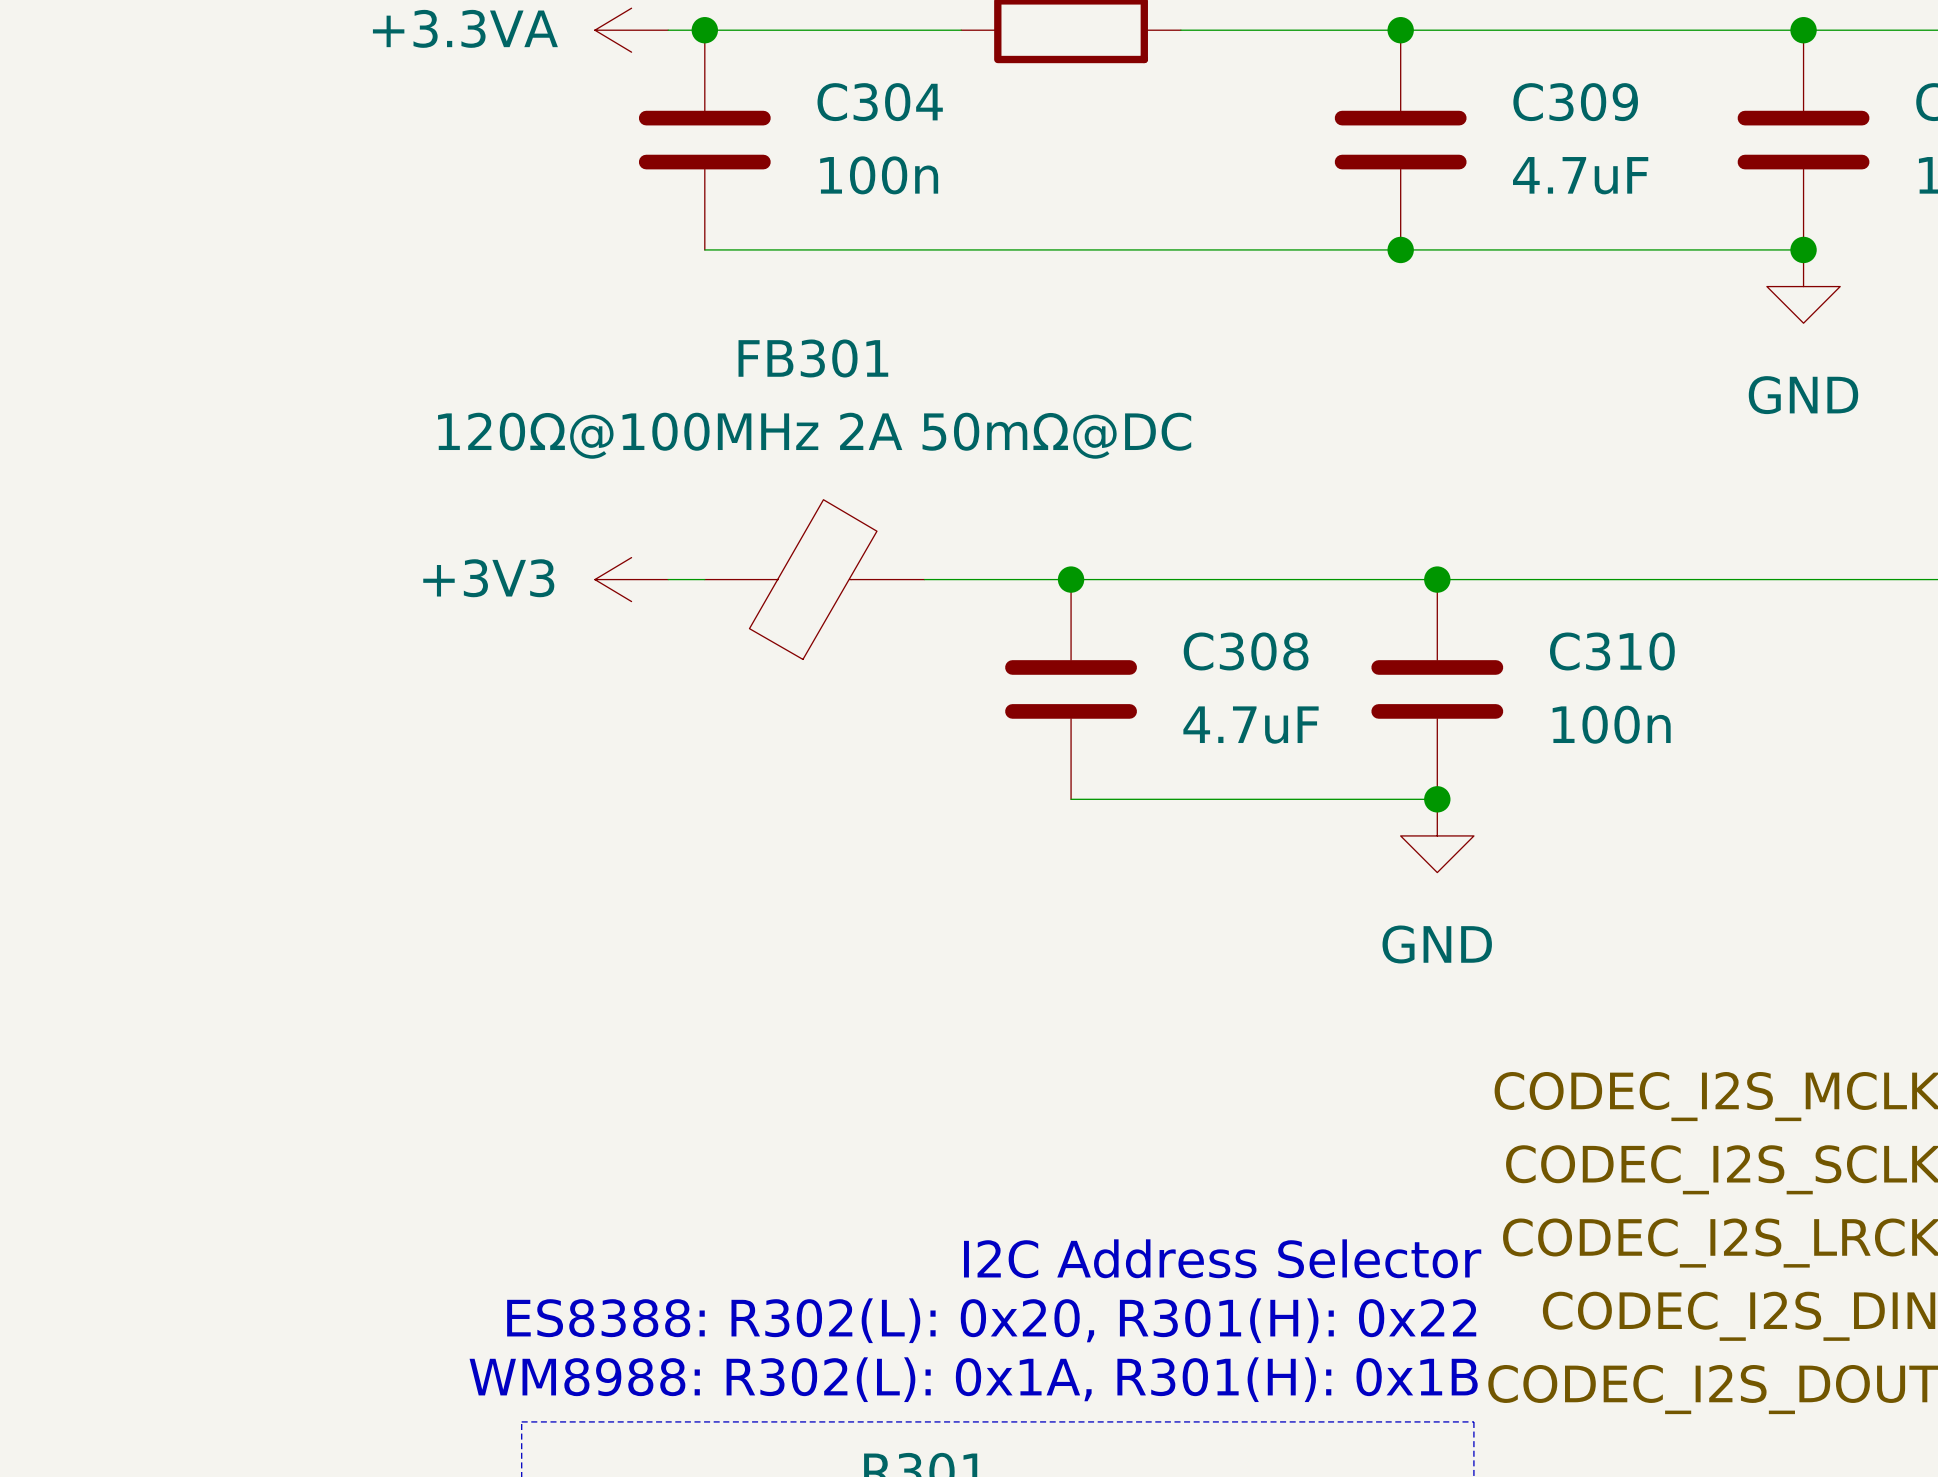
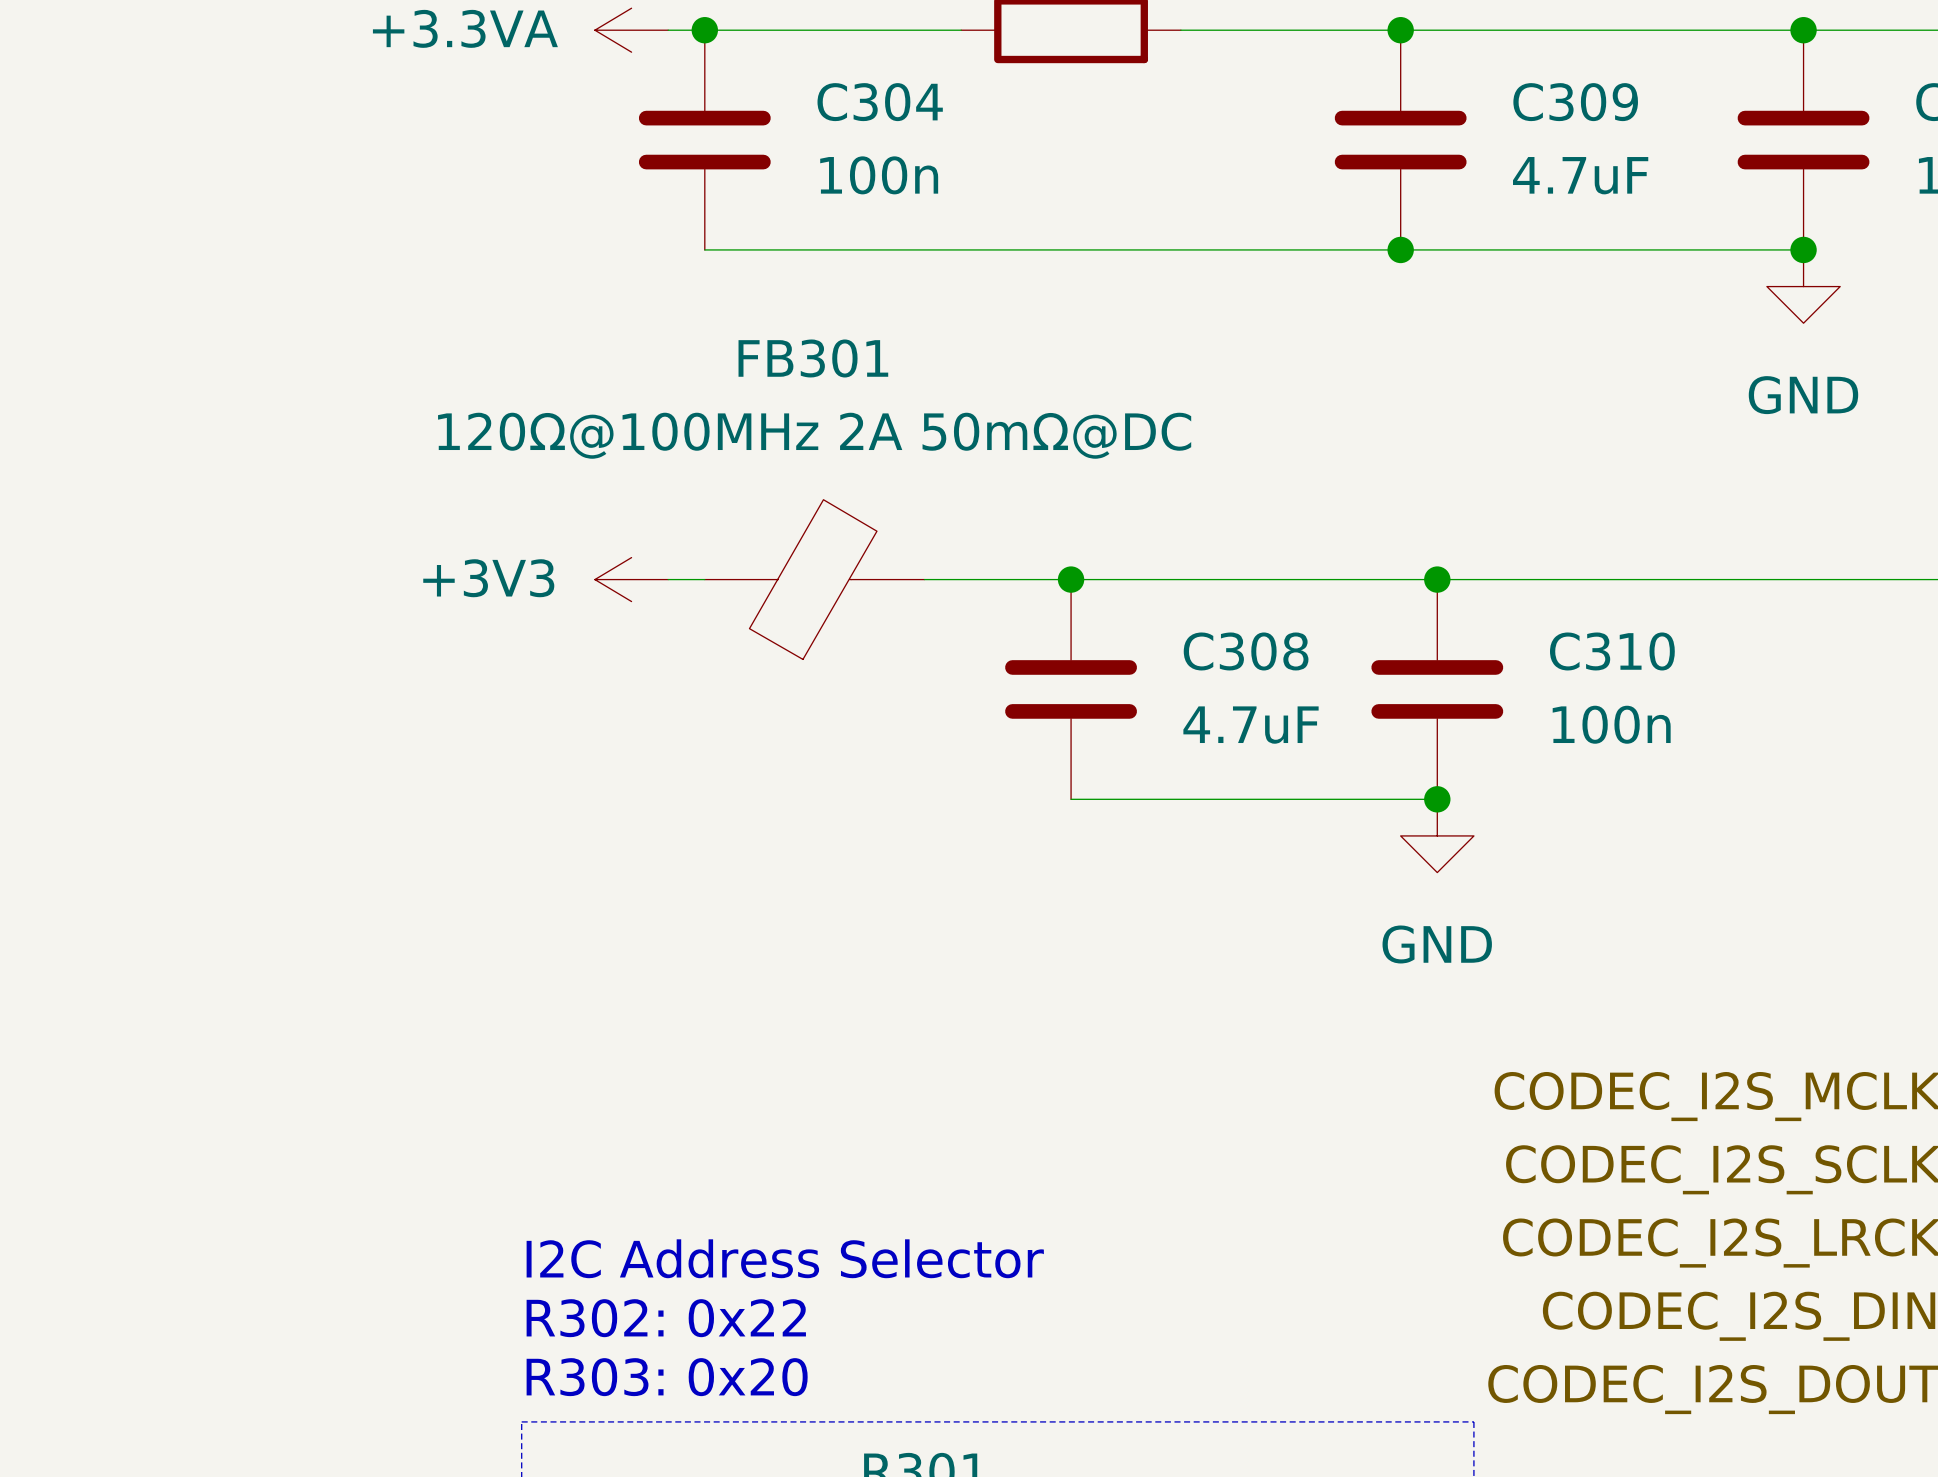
text: none -> I2C Address Selector (785, 1258)
text: I2C Address Selector (1222, 1258) -> none
text: none -> R302: 0x22 (666, 1318)
text: ES8388: R302(L): 0x20, R301(H): 0x22 (991, 1320) -> none
text: none -> R303: 0x20 (667, 1377)
text: WM8988: R302(L): 0x1A, R301(H): 0x1B (973, 1379) -> none

